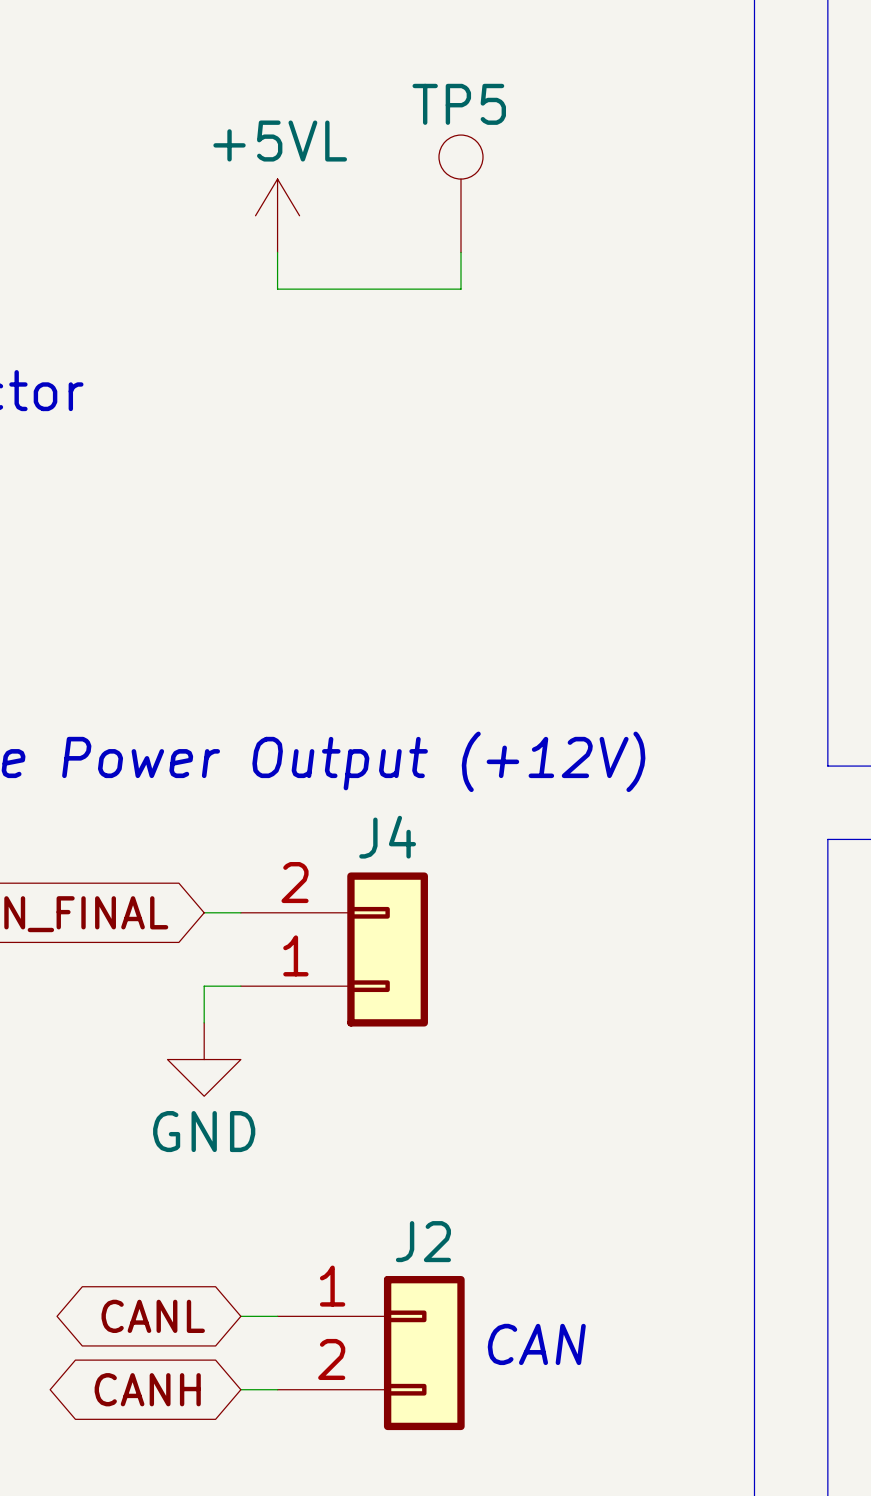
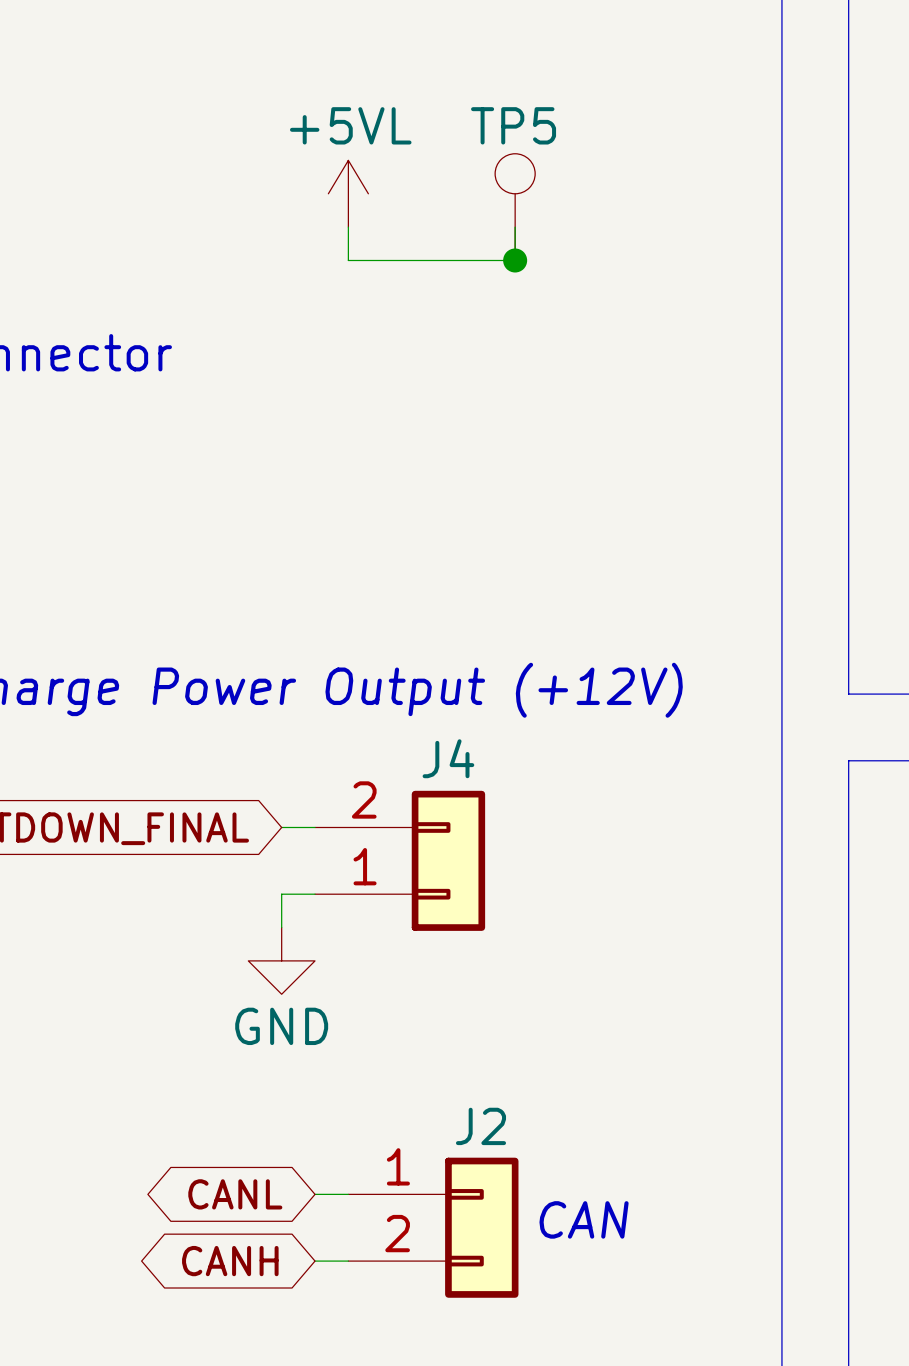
TP5 position: (460, 193) -> (515, 207)
junction: none -> (515, 260)

